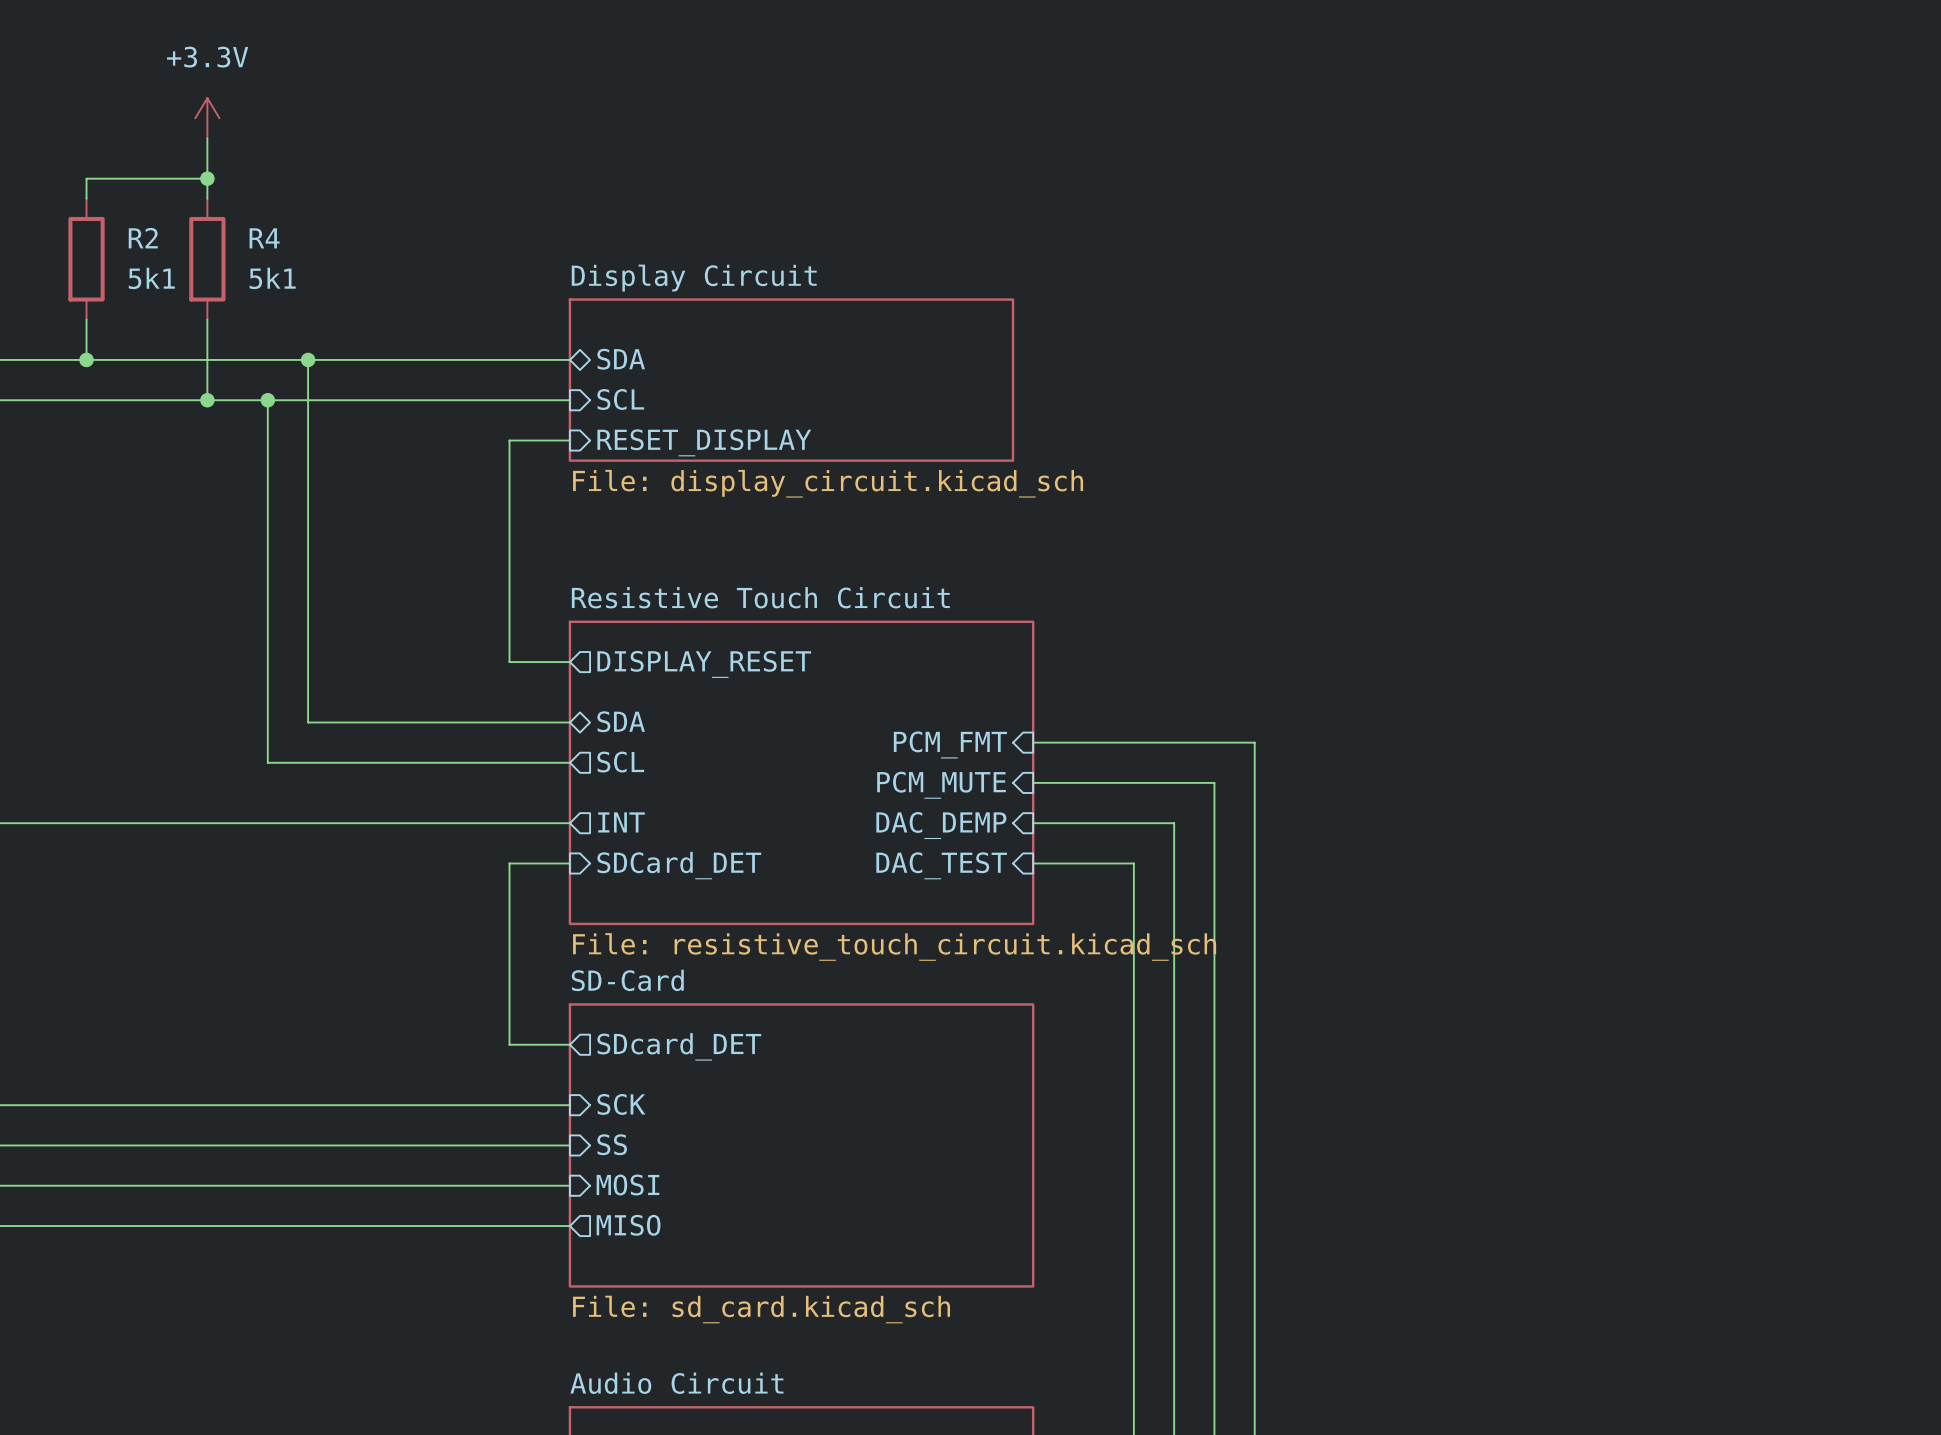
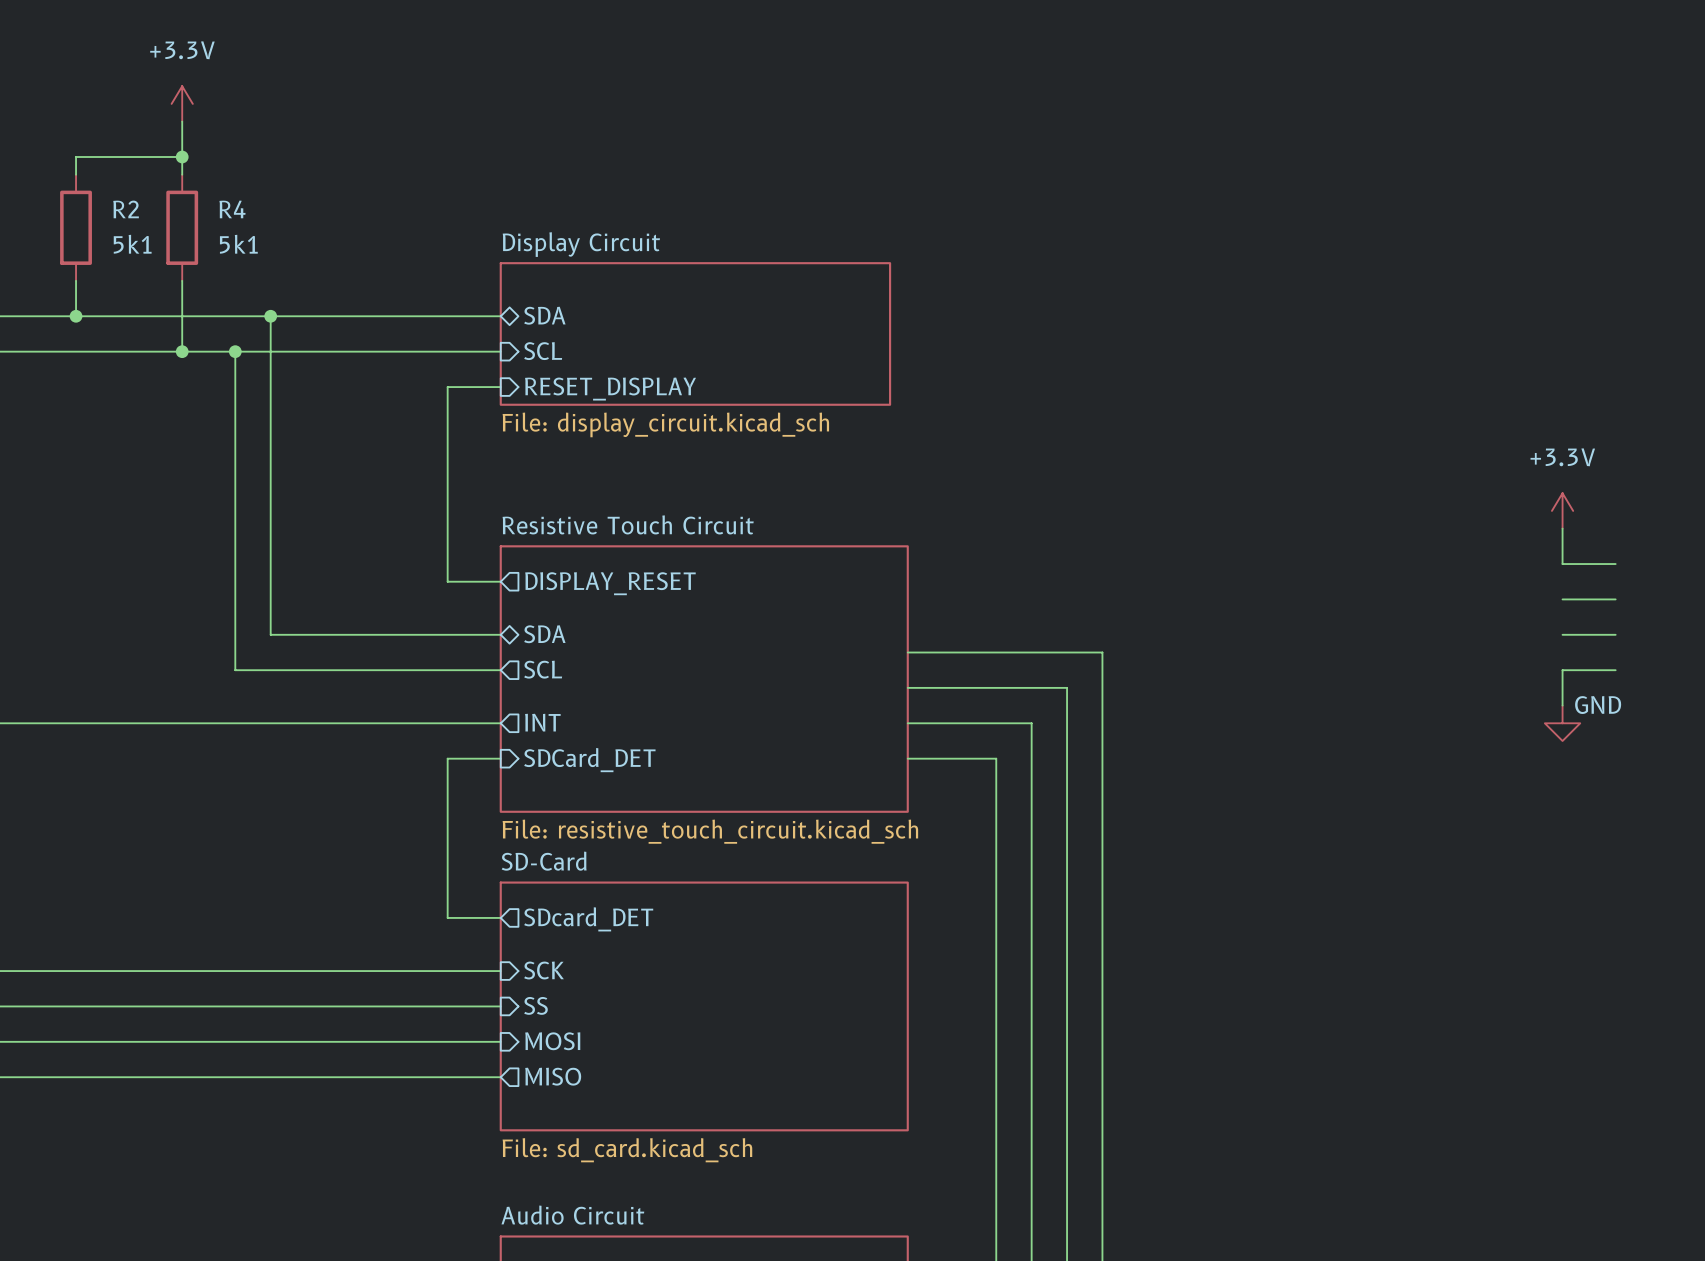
power symbol: none -> +3.3V (1562, 510)
wire: none -> (1562, 528) (1562, 564) (1615, 564)
wire: none -> (1562, 599) (1615, 599)
wire: none -> (1562, 634) (1615, 634)
sheet pin: PCM_FMT (950, 744) -> none
wire: none -> (1615, 670) (1562, 670) (1562, 705)
sheet pin: PCM_MUTE (941, 785) -> none
power symbol: none -> GND (1562, 723)
sheet pin: DAC_DEMP (941, 825) -> none
sheet pin: DAC_TEST (941, 865) -> none

